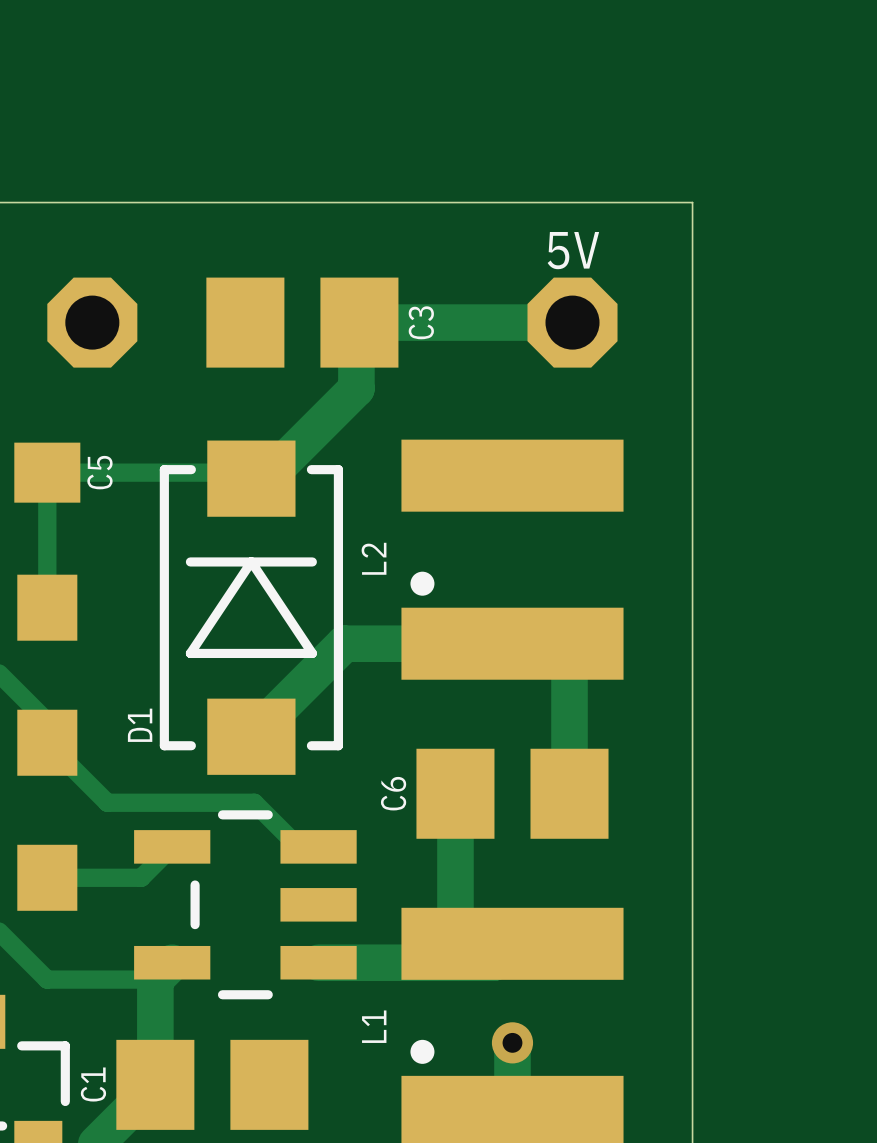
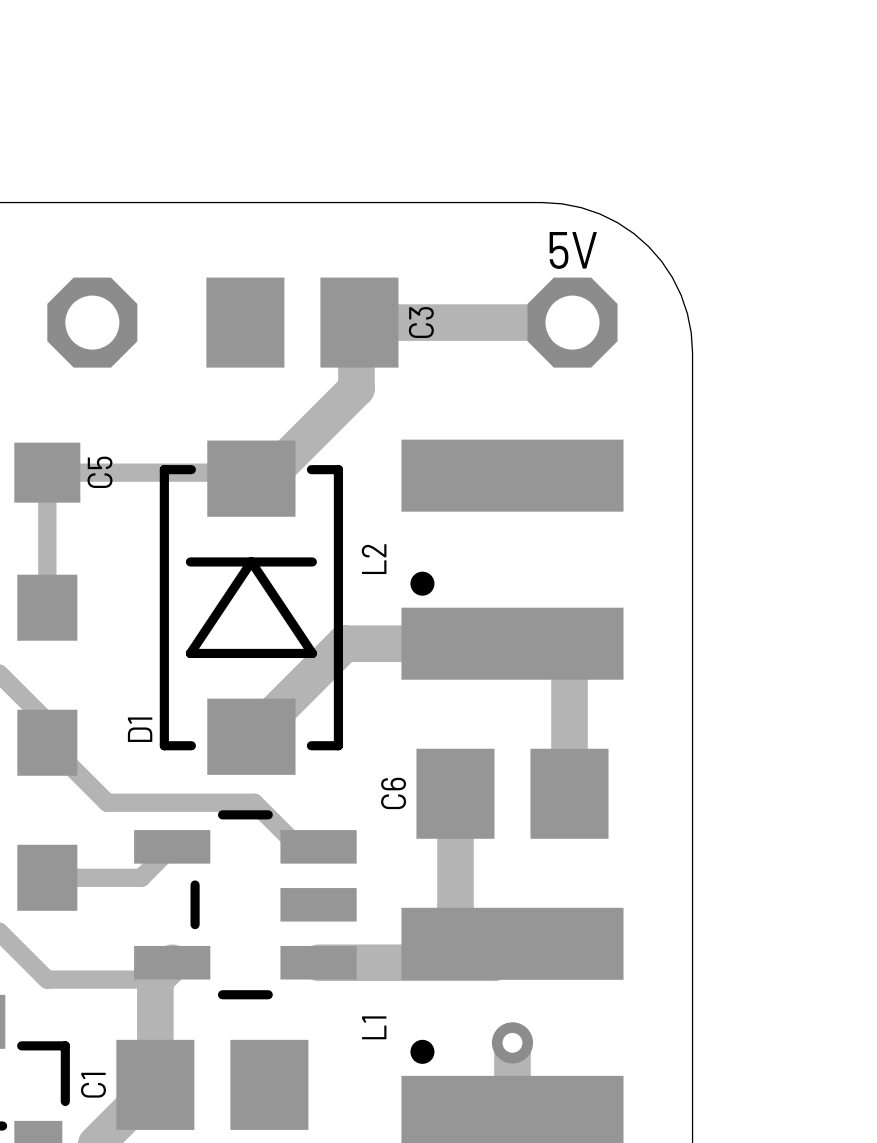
board edge: (542, 202) (692, 202) (692, 352) -> (542, 202) (562, 203) (599, 213) (617, 222) (648, 246) (672, 277) (681, 295) (691, 333) (692, 352)

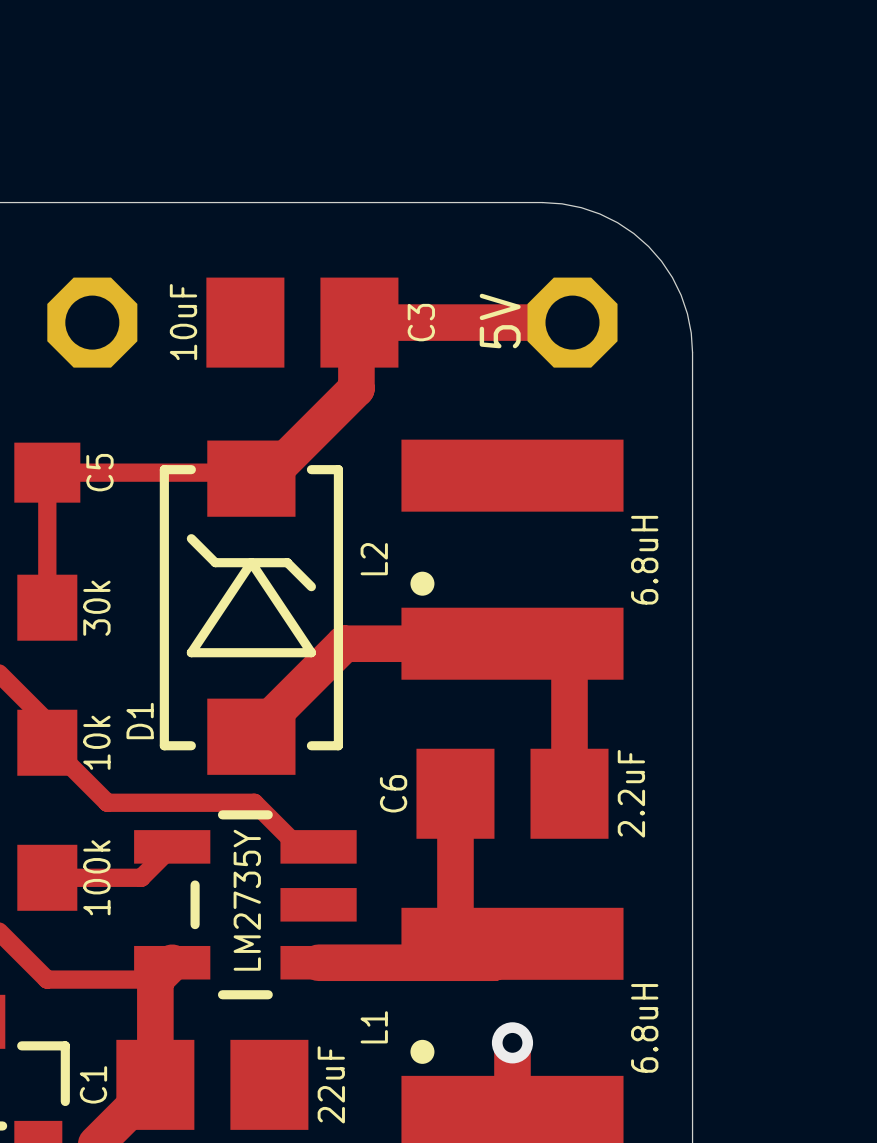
5V name rotation: 0° (573, 250) -> 90° counterclockwise (500, 321)
5V name position: 5V (573, 250) -> 5V (500, 321)
C3 value: none -> 10uF (183, 322)
D1 footprint: [159, 440, 343, 775] -> [159, 440, 343, 775]
L2 value: none -> 6.8uH (644, 560)
part value: none -> 30k (96, 608)
part value: none -> 10k (96, 742)
C6 value: none -> 2.2uF (631, 793)
part value: none -> 100k (96, 877)
part value: none -> LM2735Y (247, 900)
L1 value: none -> 6.8uH (644, 1028)
C1 value: none -> 22uF (331, 1084)

